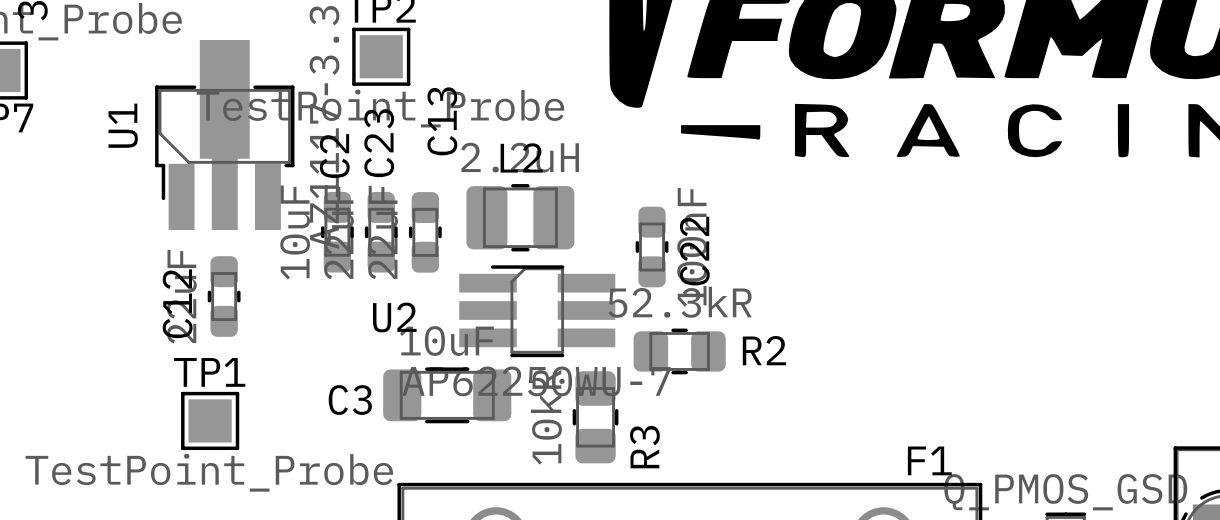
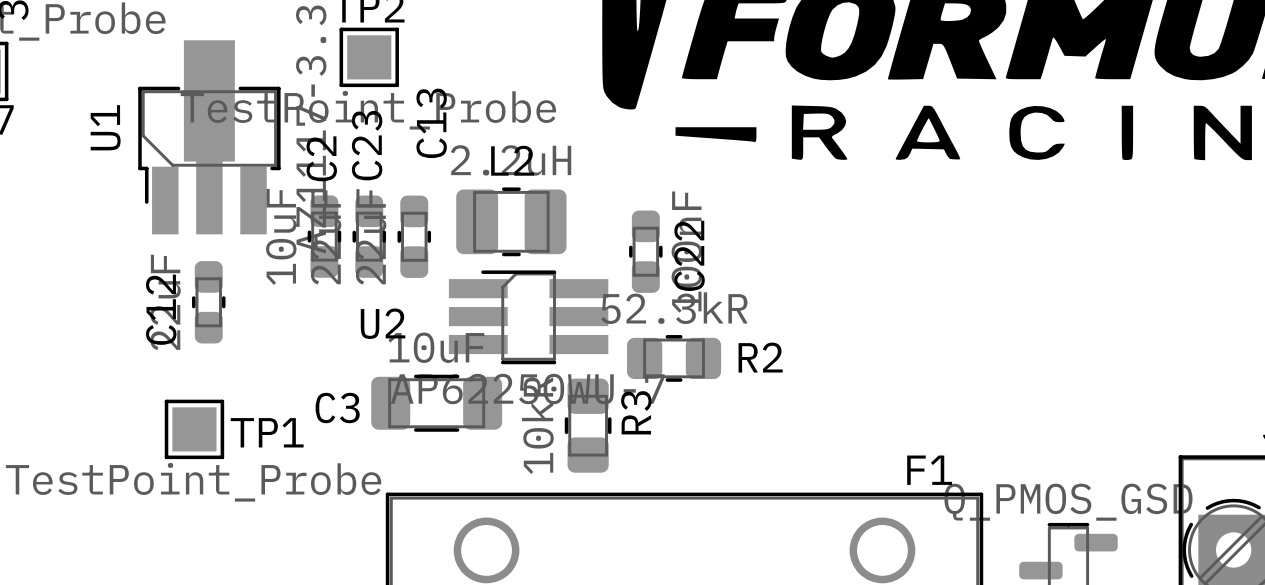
TP1 name position: TP1 (209, 372) -> TP1 (267, 432)
R3 name position: R3 (644, 447) -> R3 (636, 412)

